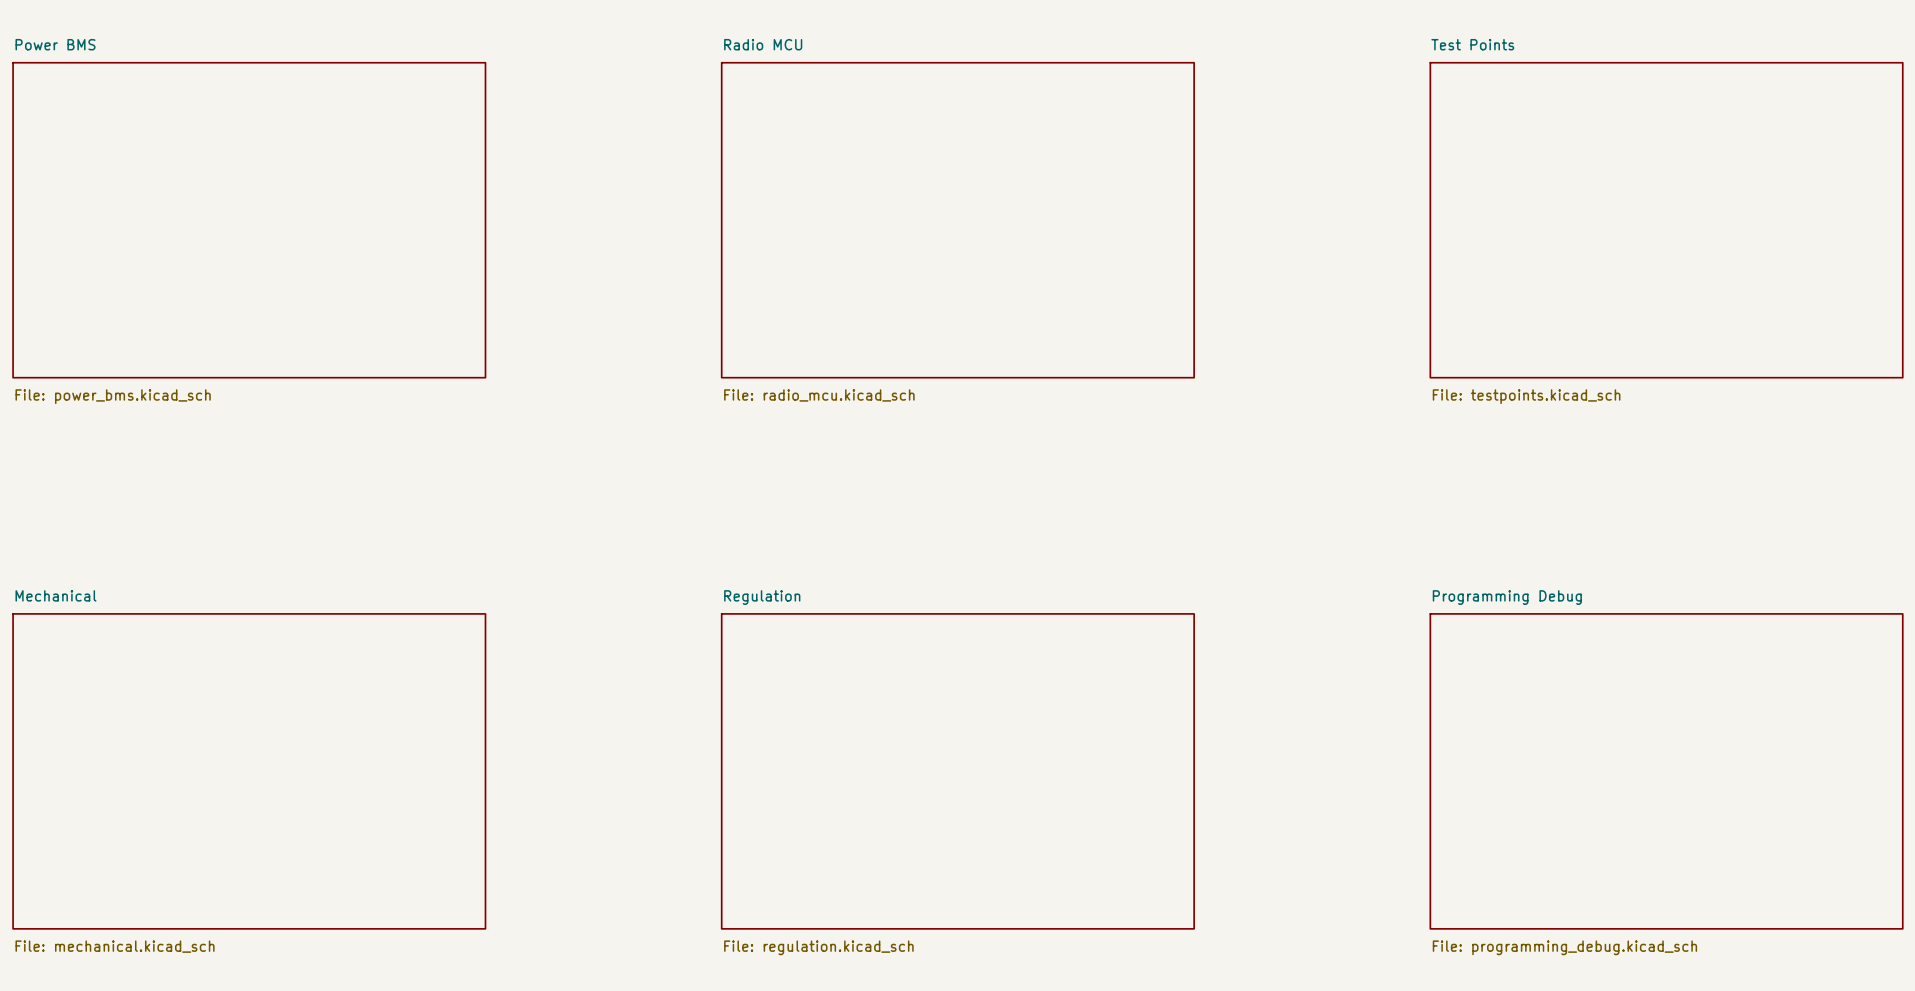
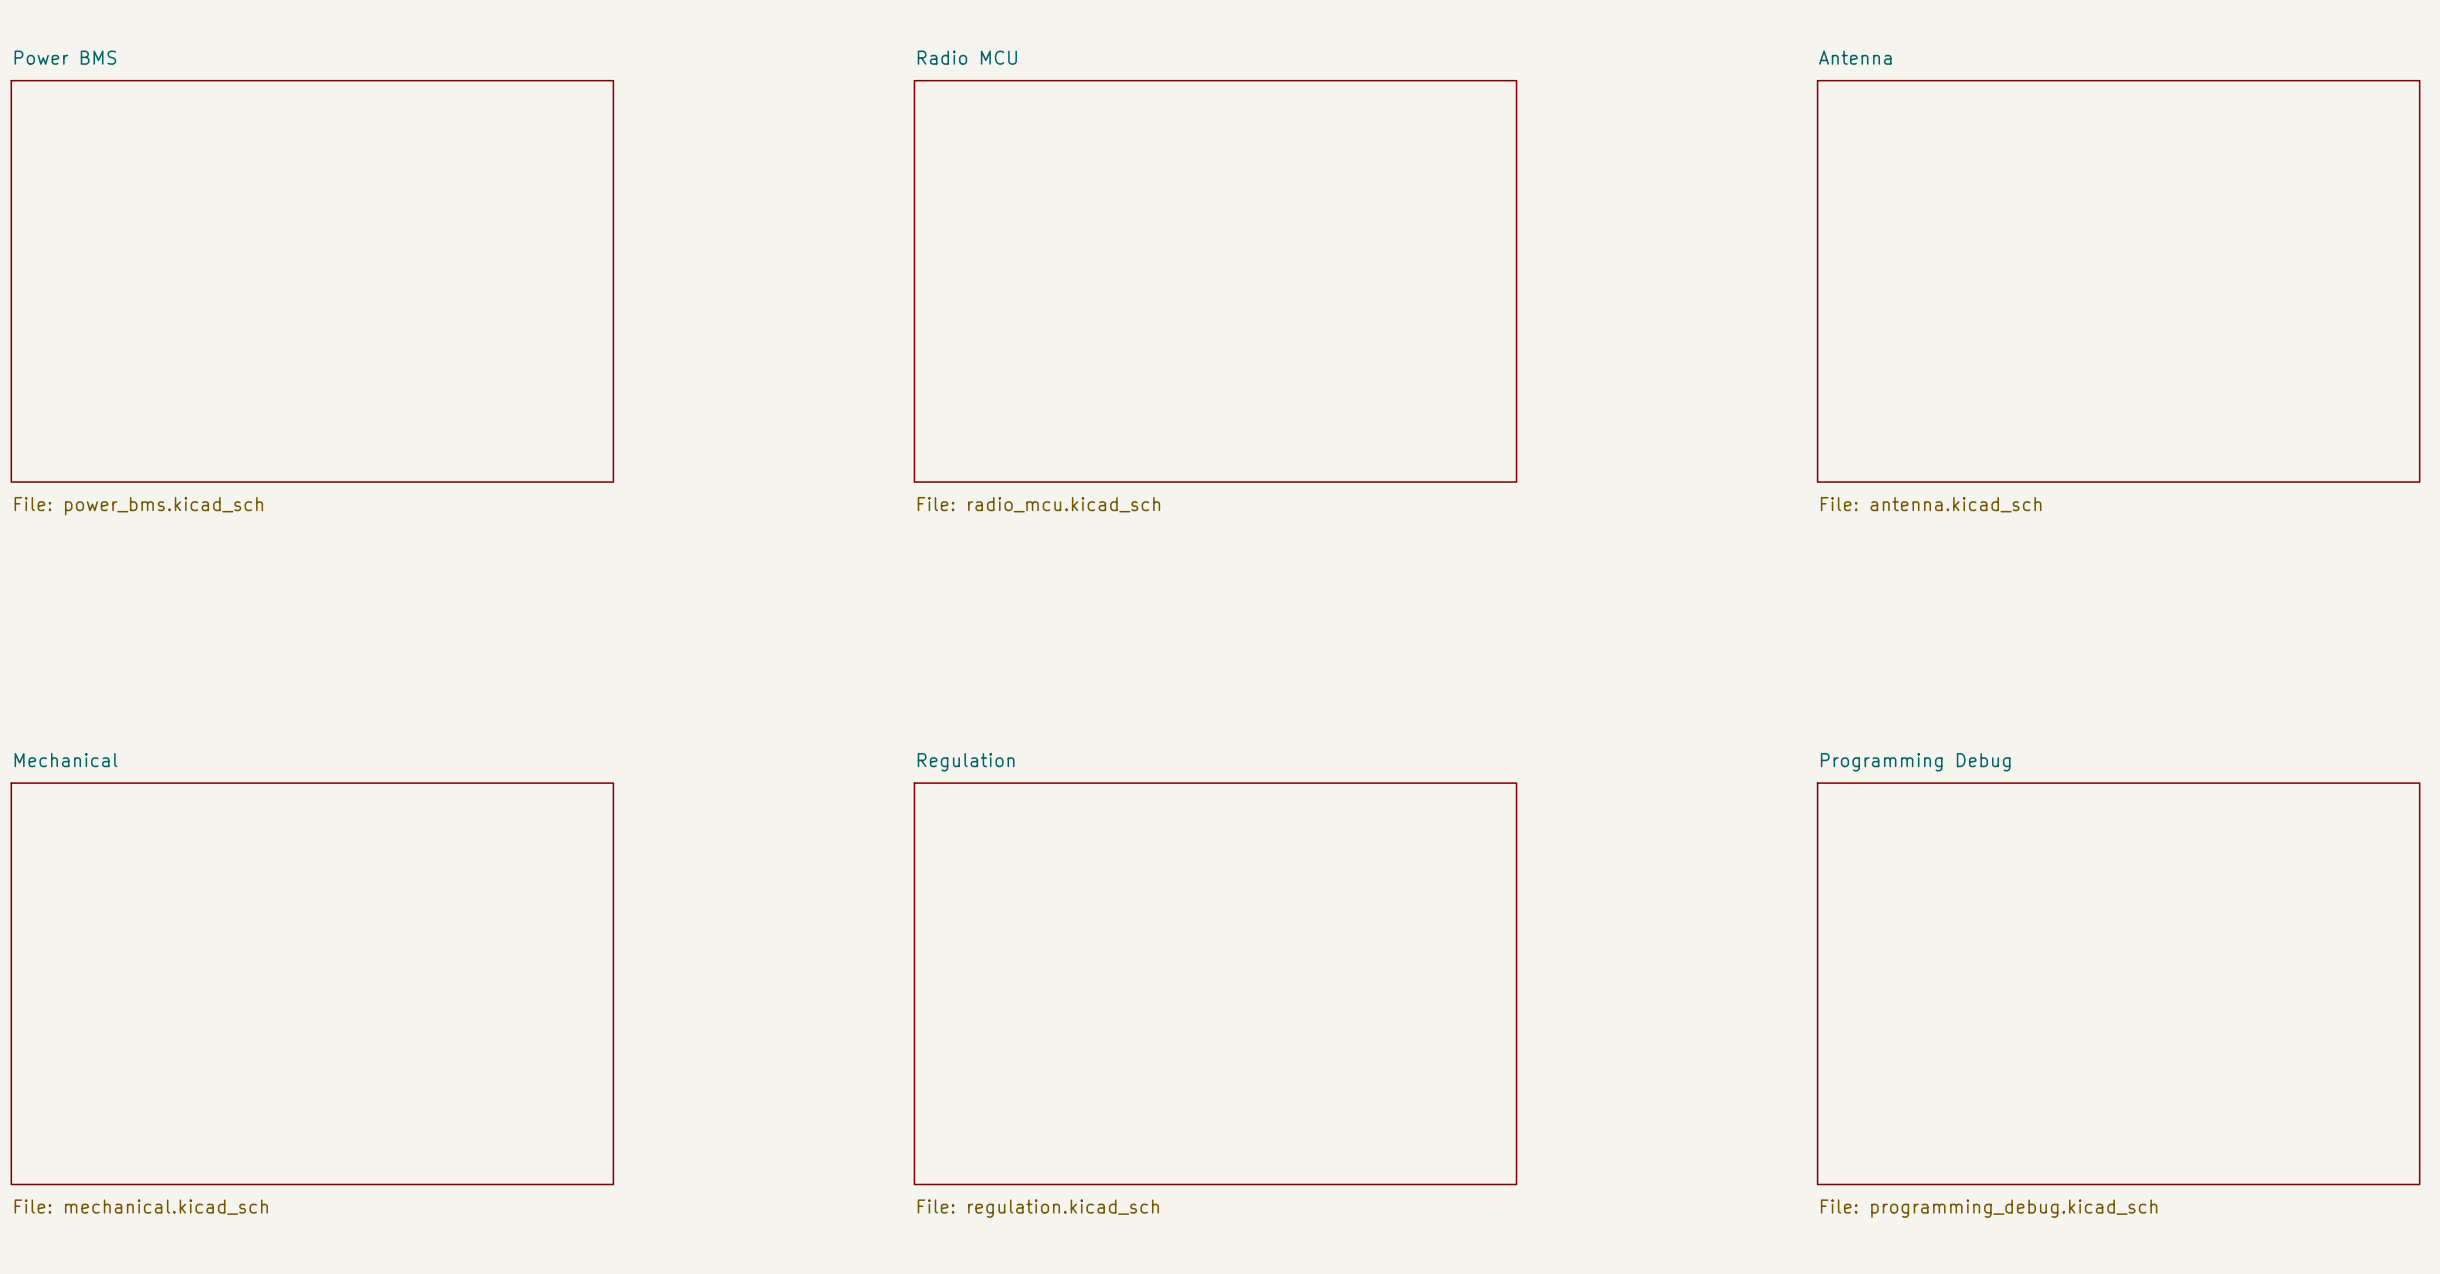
sheet Test Points name: Test Points (1472, 44) -> Antenna (1855, 57)
sheet Test Points value: File: testpoints.kicad_sch (1526, 396) -> File: antenna.kicad_sch (1931, 504)

